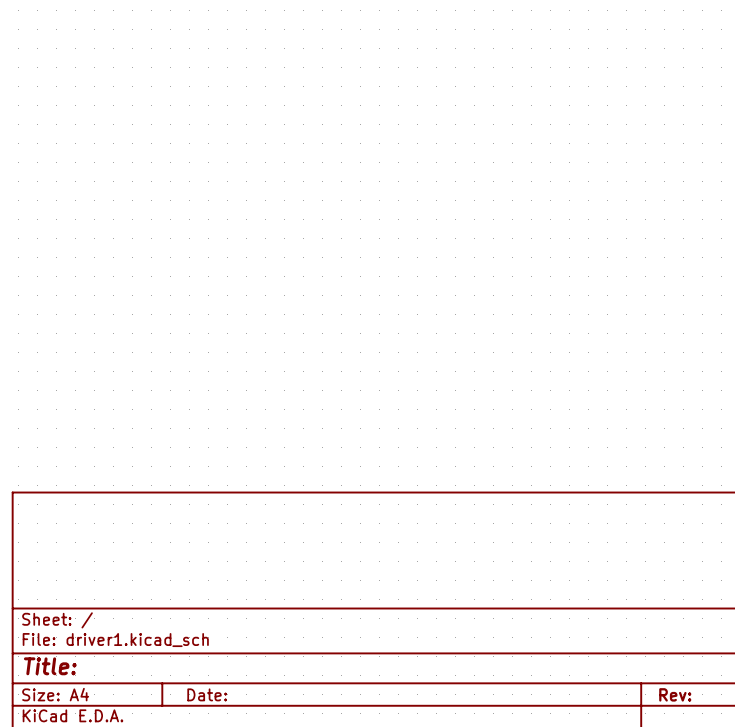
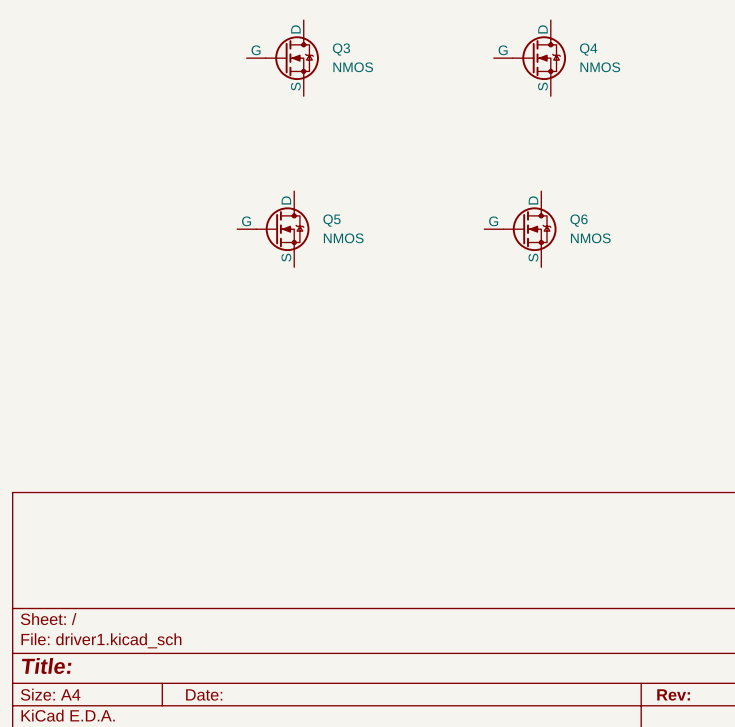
Q3: none -> NMOS (282, 58)
Q4: none -> NMOS (529, 58)
Q5: none -> NMOS (273, 229)
Q6: none -> NMOS (520, 229)

